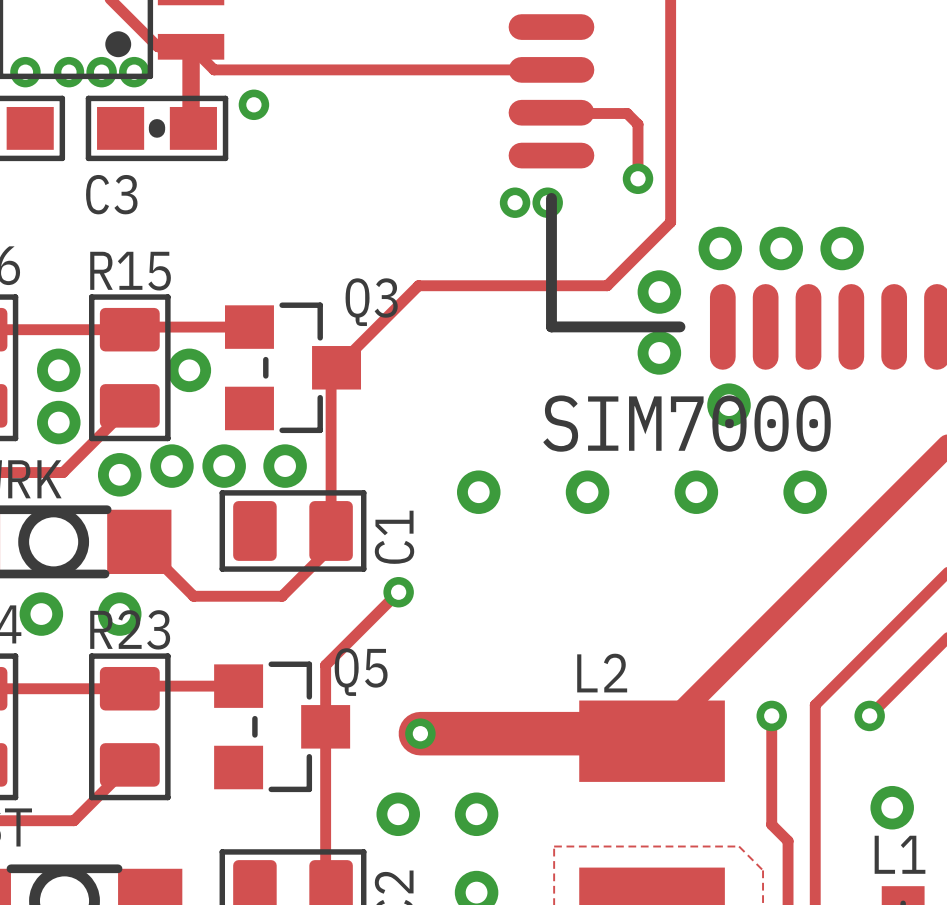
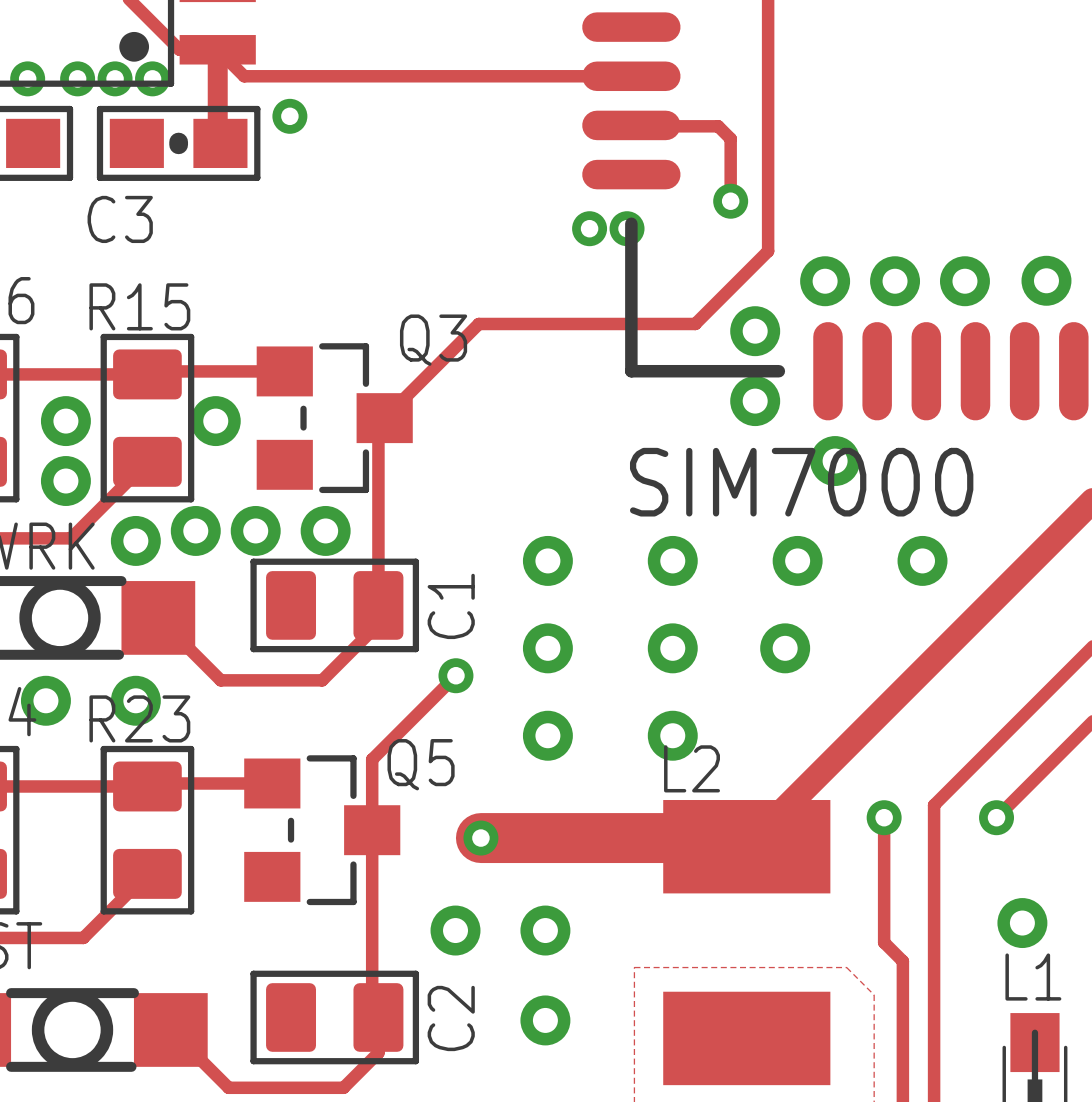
via: none -> (1046, 280)
via: none -> (547, 648)
via: none -> (672, 648)
via: none -> (785, 648)
via: none -> (547, 735)
via: none -> (672, 735)

